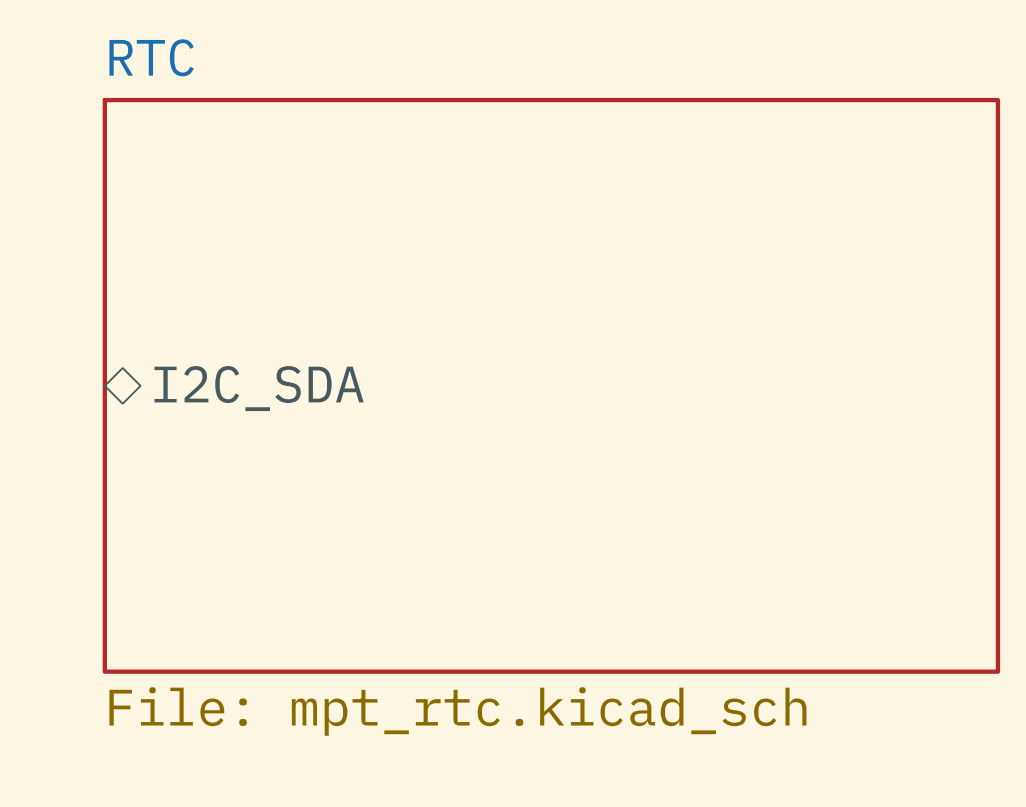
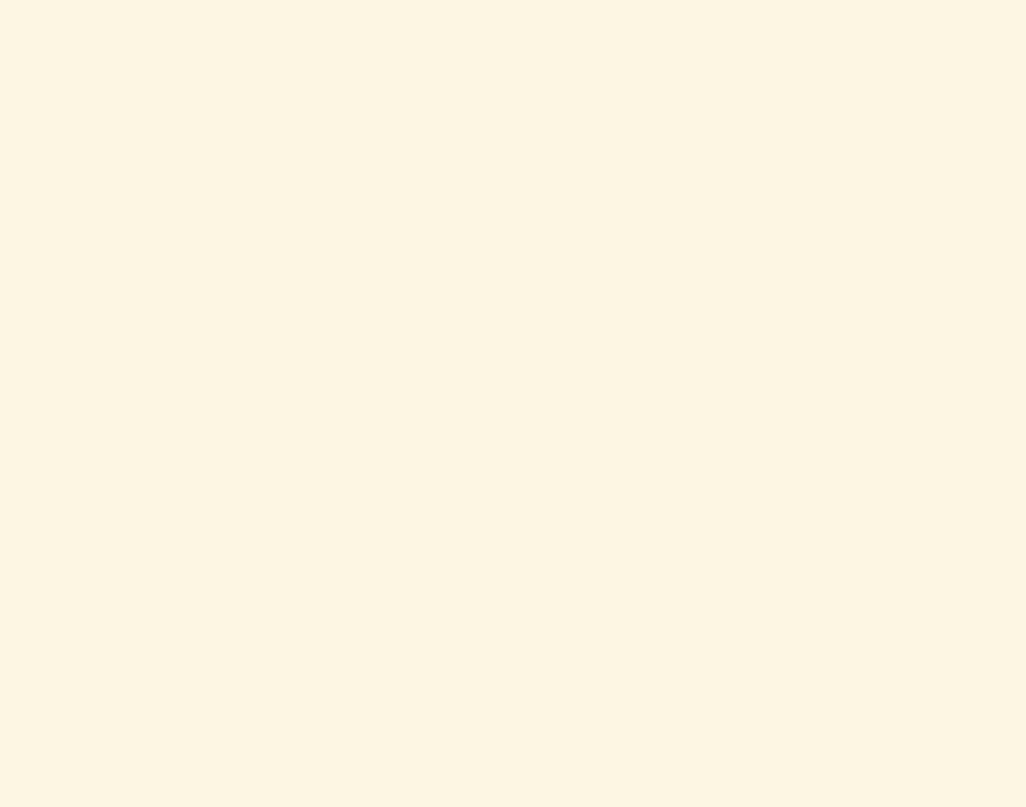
sheet RTC: File: mpt_rtc.kicad_sch (551, 385) -> none
sheet pin: I2C_SDA (259, 388) -> none

